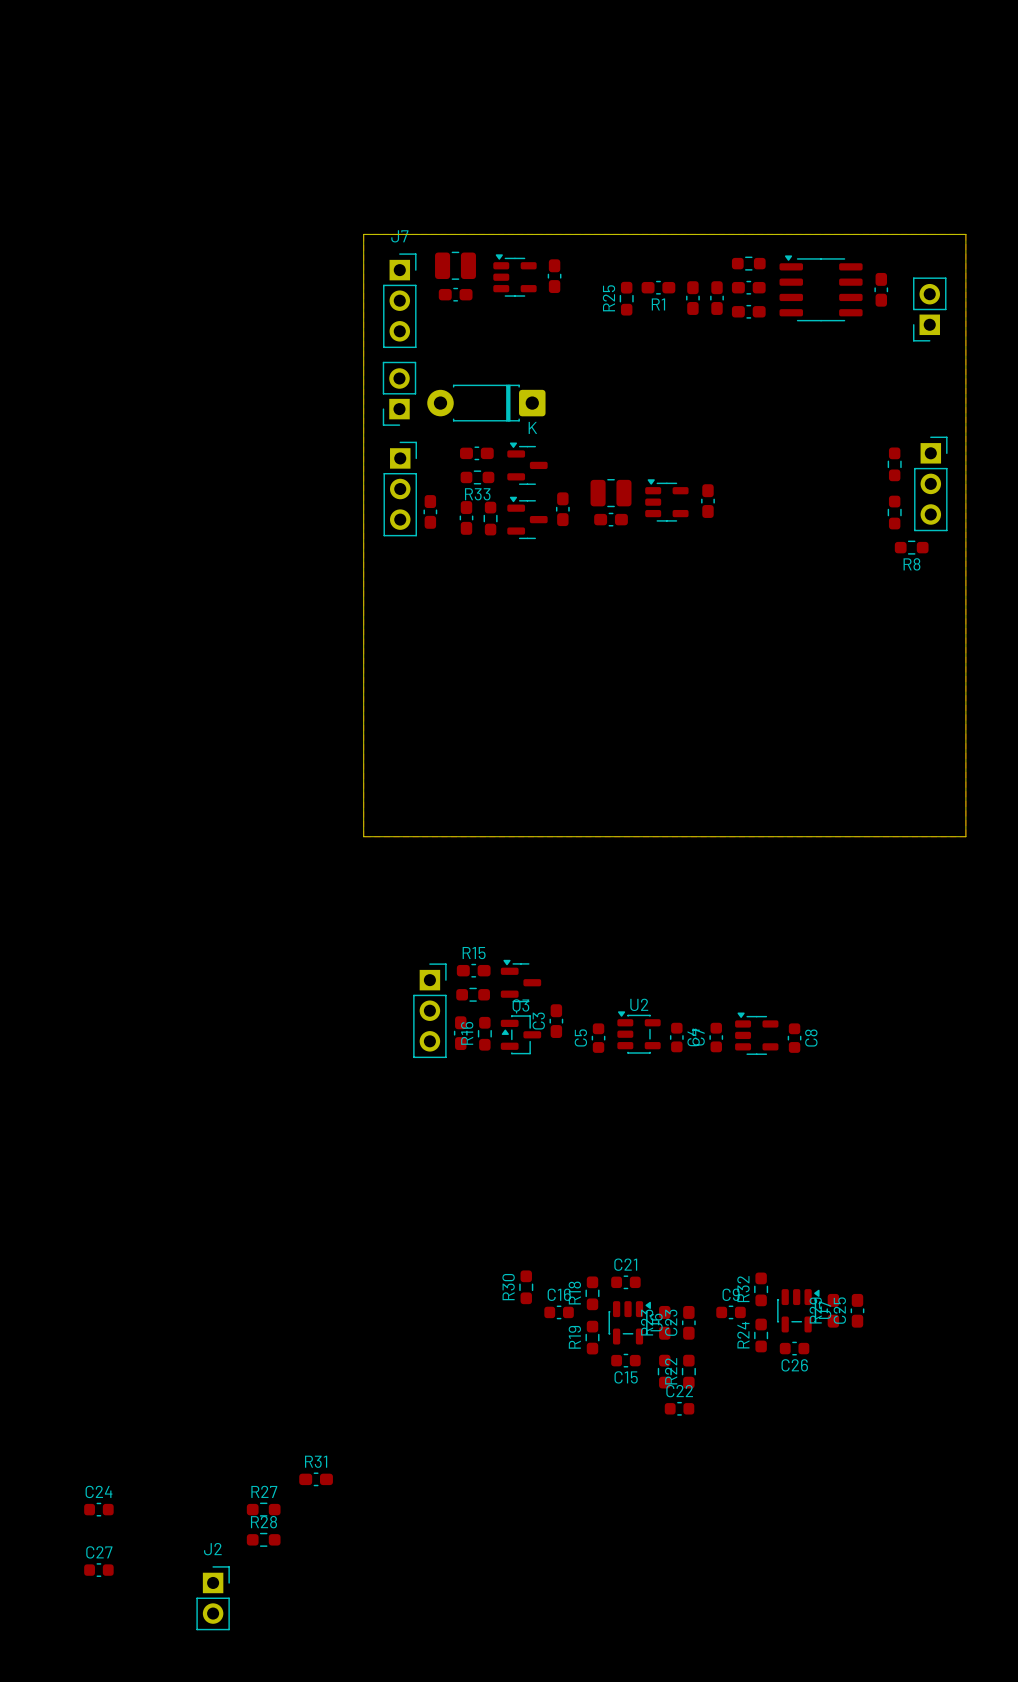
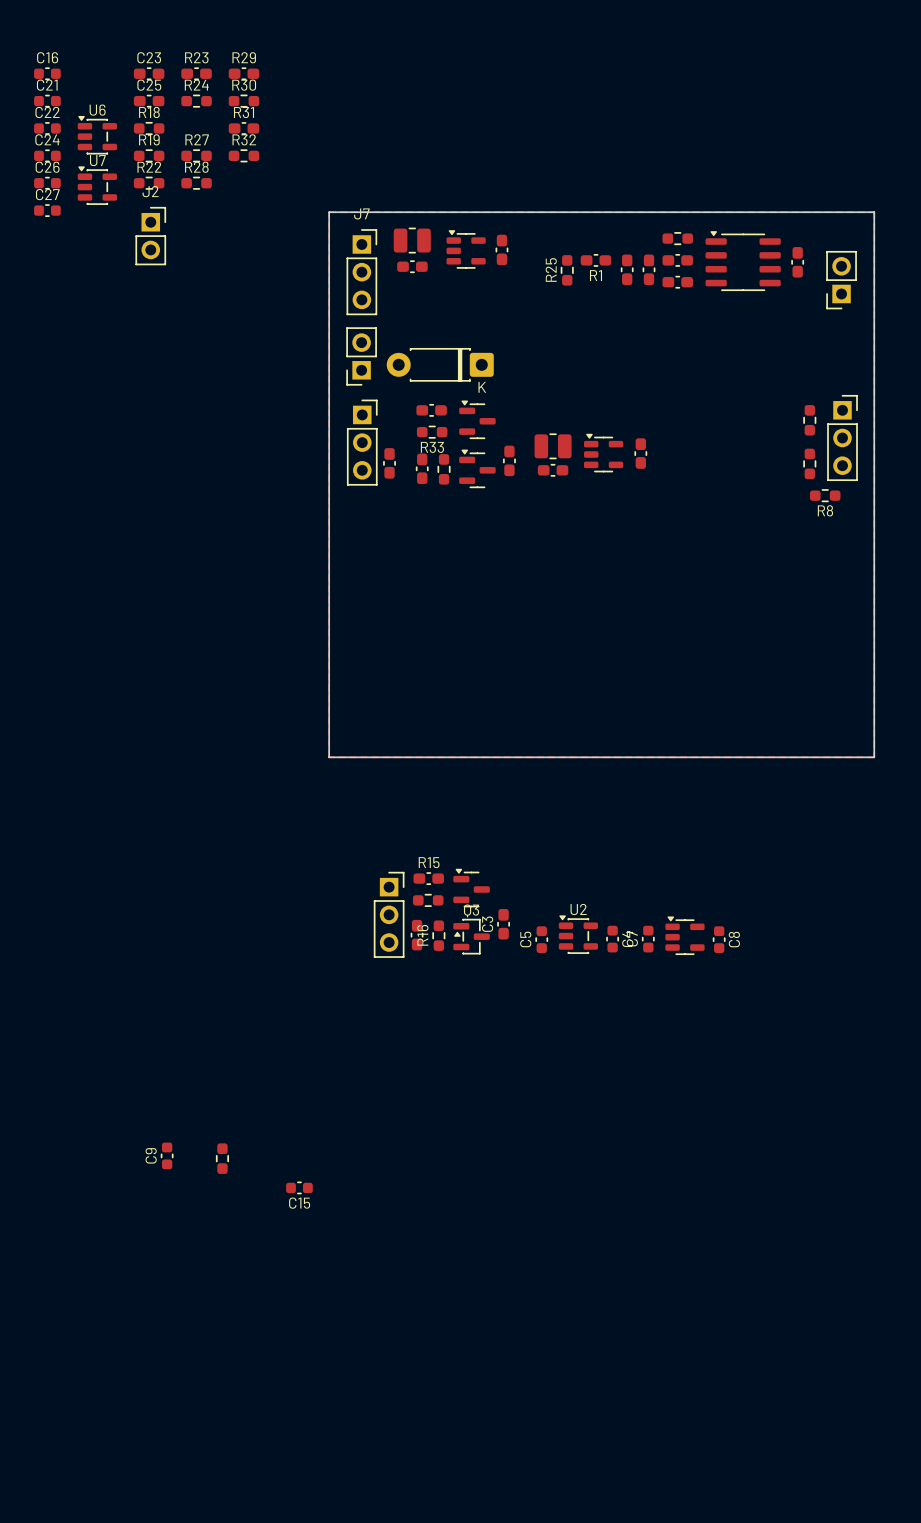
part: none -> (222, 1158)
C21 position: (625, 1282) -> (47, 101)
R30 rotation: 0° (526, 1287) -> 90° clockwise (243, 101)
R30 position: (526, 1287) -> (243, 101)
R32 rotation: 0° (761, 1289) -> 90° clockwise (243, 155)
R32 position: (761, 1289) -> (243, 155)
R18 rotation: 0° (592, 1293) -> 90° clockwise (149, 128)
R18 position: (592, 1293) -> (149, 128)
C9 name position: C9 (731, 1294) -> C9 (151, 1155)
U7 rotation: 0° (798, 1310) -> 90° counterclockwise (97, 185)
U7 position: (798, 1310) -> (97, 185)
R29 rotation: 0° (833, 1310) -> 90° clockwise (243, 73)
R29 position: (833, 1310) -> (243, 73)
C25 rotation: 0° (857, 1310) -> 90° clockwise (149, 101)
C25 position: (857, 1310) -> (149, 101)
C16 position: (559, 1312) -> (47, 73)
C9 rotation: 0° (731, 1312) -> 90° clockwise (167, 1155)
C9 position: (731, 1312) -> (167, 1155)
U6 rotation: 0° (629, 1322) -> 90° counterclockwise (97, 135)
U6 position: (629, 1322) -> (97, 135)
R23 rotation: 0° (664, 1322) -> 90° clockwise (196, 73)
R23 position: (664, 1322) -> (196, 73)
C23 rotation: 0° (688, 1322) -> 90° clockwise (149, 73)
C23 position: (688, 1322) -> (149, 73)
R24 rotation: 0° (761, 1335) -> 90° clockwise (196, 101)
R24 position: (761, 1335) -> (196, 101)
R19 rotation: 0° (592, 1337) -> 90° clockwise (149, 155)
R19 position: (592, 1337) -> (149, 155)
C26 position: (794, 1348) -> (47, 183)
C15 position: (625, 1360) -> (299, 1187)
C26 name position: C26 (794, 1365) -> C26 (47, 167)
part: (664, 1371) -> none
R22 rotation: 0° (688, 1371) -> 90° clockwise (149, 183)
R22 position: (688, 1371) -> (149, 183)
C22 position: (679, 1408) -> (47, 128)
R31 position: (316, 1479) -> (243, 128)
C24 position: (98, 1509) -> (47, 155)
R27 position: (263, 1509) -> (196, 155)
R28 position: (263, 1539) -> (196, 183)
C27 position: (98, 1570) -> (47, 210)
J2 position: (213, 1598) -> (150, 236)

